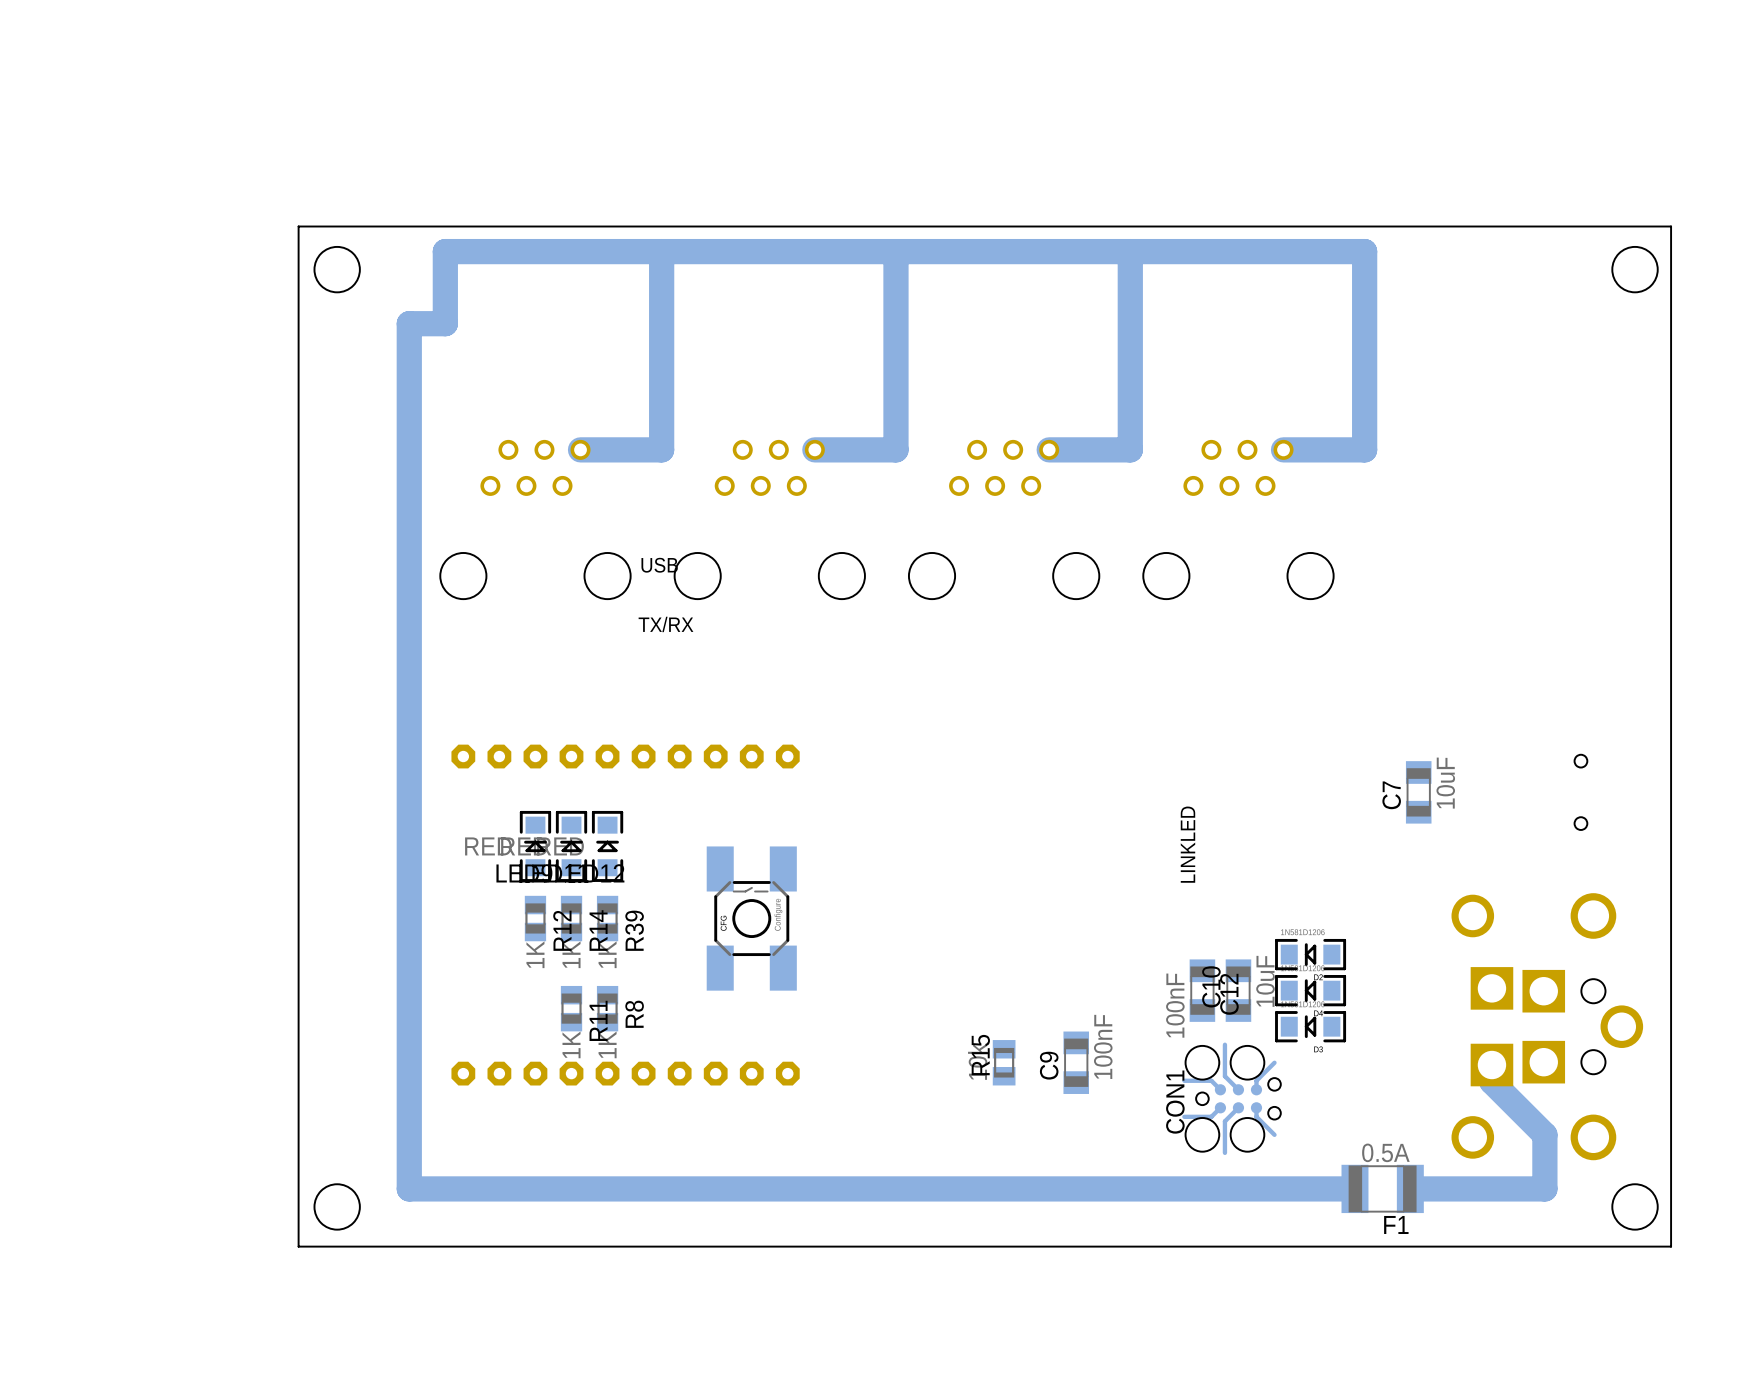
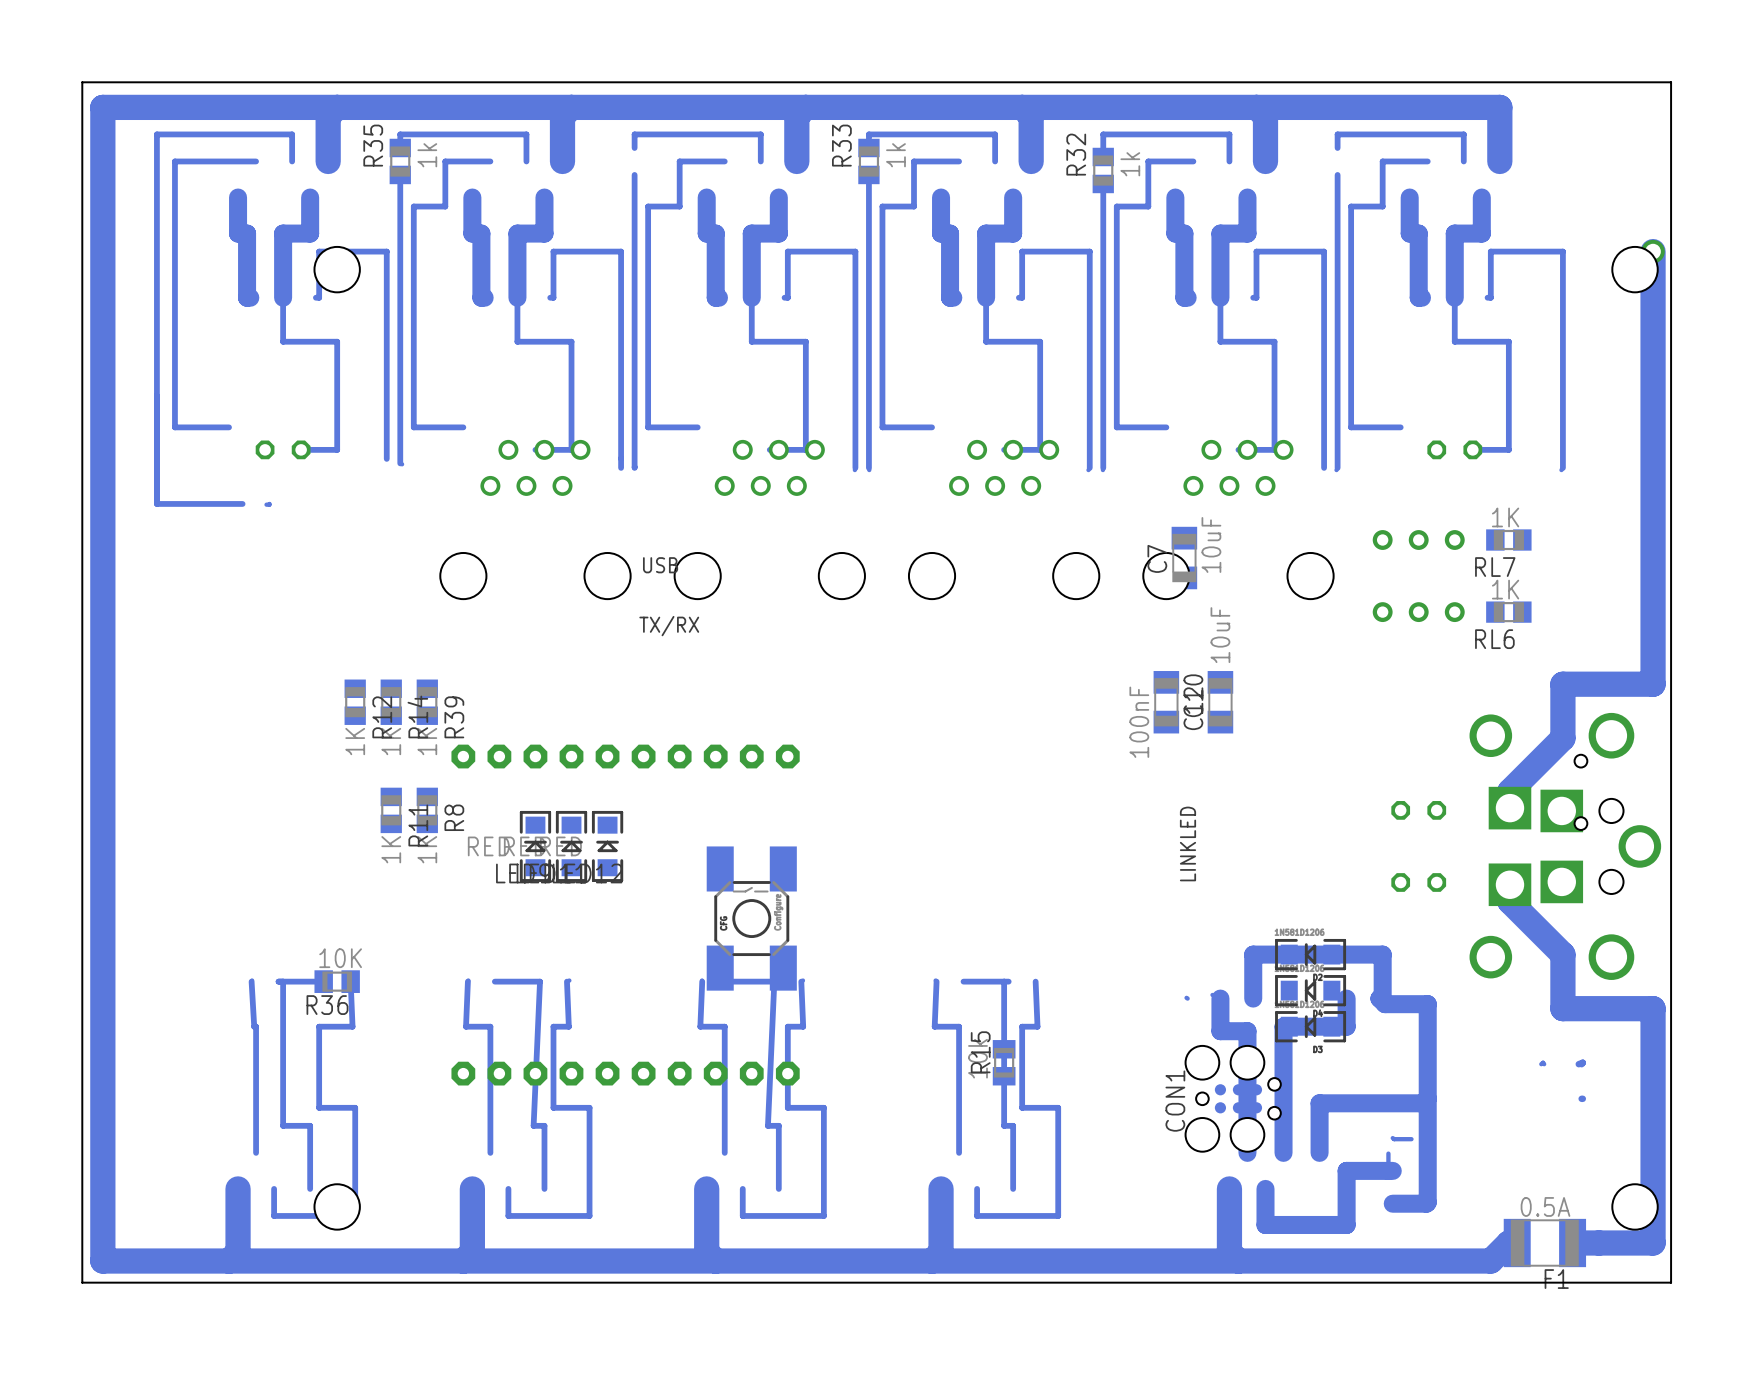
track: none -> (337, 107) (328, 116) (328, 161)
track: none -> (571, 107) (562, 116) (562, 161)
track: none -> (805, 107) (796, 116) (796, 161)
track: none -> (1022, 107) (1031, 116) (1031, 161)
track: none -> (1256, 107) (1265, 116) (1265, 161)
track: none -> (400, 147) (400, 134) (526, 134) (526, 161)
track: none -> (634, 147) (634, 134) (760, 134) (760, 161)
track: none -> (868, 147) (868, 134) (995, 134) (995, 161)
track: none -> (1337, 147) (1337, 134) (1463, 134) (1463, 161)
track: none -> (1103, 157) (1103, 134) (1229, 134) (1229, 161)
track: none -> (256, 161) (174, 161) (174, 427) (229, 427)
track: none -> (292, 161) (292, 134) (156, 134) (156, 503) (242, 503)
R35: none -> 1k (400, 161)
track: none -> (490, 161) (445, 161) (445, 206) (413, 206) (413, 427) (463, 427)
track: none -> (724, 161) (679, 161) (679, 206) (648, 206) (648, 427) (697, 427)
R33: none -> 1k (868, 161)
track: none -> (959, 161) (914, 161) (914, 206) (882, 206) (882, 427) (932, 427)
track: none -> (1193, 161) (1148, 161) (1148, 206) (1116, 206) (1116, 427) (1166, 427)
track: none -> (1427, 161) (1382, 161) (1382, 206) (1351, 206) (1351, 427) (1400, 427)
track: none -> (1499, 161) (1499, 107) (102, 107) (102, 1261) (1490, 1261) (1508, 1243) (1517, 1243)
R32: none -> 1k (1103, 170)
track: none -> (400, 174) (400, 463) (402, 464)
track: none -> (634, 174) (634, 467)
track: none -> (868, 174) (869, 470)
track: none -> (1337, 174) (1336, 470)
track: none -> (1103, 183) (1102, 470)
track: none -> (238, 197) (238, 233) (247, 233) (247, 297) (250, 297)
track: none -> (310, 197) (310, 233) (283, 233) (283, 341) (337, 341) (337, 449) (301, 449)
track: none -> (472, 197) (472, 233) (481, 233) (481, 297) (484, 297)
track: none -> (544, 197) (544, 233) (517, 233) (517, 341) (571, 341) (571, 449) (535, 449)
track: none -> (706, 197) (706, 233) (715, 233) (715, 297) (718, 297)
track: none -> (778, 197) (778, 233) (751, 233) (751, 341) (805, 341) (805, 449) (769, 449)
track: none -> (941, 197) (941, 233) (950, 233) (950, 297) (953, 297)
track: none -> (1013, 197) (1013, 233) (986, 233) (986, 341) (1040, 341) (1040, 449) (1004, 449)
track: none -> (1175, 197) (1175, 233) (1184, 233) (1184, 297) (1187, 297)
track: none -> (1247, 197) (1247, 233) (1220, 233) (1220, 341) (1274, 341) (1274, 449) (1238, 449)
track: none -> (1409, 197) (1409, 233) (1418, 233) (1418, 297) (1421, 297)
track: none -> (1481, 197) (1481, 233) (1454, 233) (1454, 341) (1508, 341) (1508, 449) (1472, 449)
board edge: (1671, 226) (298, 226) (298, 1246) (1671, 1246) -> (1671, 226) (1671, 82) (82, 82) (82, 1282) (1671, 1282) (1671, 1246)
track: (553, 251) (445, 251) (445, 323) (409, 323) (409, 1188) (1354, 1188) -> (553, 251) (553, 297) (550, 297)
track: none -> (621, 251) (621, 467)
track width: thick (621, 251) (553, 251) -> thin (621, 251) (553, 251)
track: (661, 251) (661, 449) (580, 449) -> none
track: (787, 251) (621, 251) -> (787, 251) (787, 297) (784, 297)
track: none -> (855, 251) (854, 470)
track width: thick (855, 251) (787, 251) -> thin (855, 251) (787, 251)
track: (895, 251) (895, 449) (814, 449) -> none
track: (1022, 251) (855, 251) -> (1022, 251) (1022, 297) (1018, 297)
track: none -> (1089, 251) (1088, 470)
track width: thick (1089, 251) (1022, 251) -> thin (1089, 251) (1022, 251)
track: (1130, 251) (1130, 449) (1049, 449) -> none
track: (1256, 251) (1089, 251) -> (1256, 251) (1256, 297) (1253, 297)
track: (1324, 251) (1364, 251) (1364, 449) (1283, 449) -> (1324, 251) (1324, 467)
track width: thick (1324, 251) (1256, 251) -> thin (1324, 251) (1256, 251)
track: none -> (1653, 251) (1653, 684) (1562, 684) (1562, 738) (1509, 791) (1509, 808)
via: none -> (1653, 251)
track: none -> (315, 297) (319, 297) (319, 251) (386, 251) (386, 458)
track: none -> (1487, 297) (1490, 297) (1490, 251) (1562, 251) (1561, 470)
part: none -> (283, 449)
part: none -> (1454, 449)
track: none -> (269, 503) (266, 504)
part: none -> (1418, 540)
RL7: none -> 1K (1508, 540)
part: none -> (1418, 612)
RL6: none -> 1K (1508, 612)
C7 position: (1418, 792) -> (1184, 558)
part: none -> (1418, 810)
part: none -> (1418, 882)
track: none -> (1509, 884) (1509, 901) (1562, 954) (1562, 1008) (1653, 1008) (1653, 1243) (1572, 1243)
R12 position: (535, 918) -> (355, 702)
R14 position: (571, 918) -> (391, 702)
R39 position: (607, 918) -> (427, 702)
track: none -> (252, 980) (254, 1026) (256, 1026) (256, 1152)
track: none -> (321, 980) (323, 981) (278, 981)
track: none -> (353, 980) (350, 981) (352, 1026) (319, 1026) (319, 1107) (355, 1107) (355, 1215) (274, 1215) (274, 1188)
track: none -> (468, 980) (466, 1026) (490, 1026) (490, 1152)
track: none -> (569, 980) (566, 981) (568, 1026) (553, 1026) (553, 1107) (589, 1107) (589, 1215) (508, 1215) (508, 1188)
track: none -> (702, 980) (700, 1026) (724, 1026) (724, 1152)
track: none -> (802, 980) (801, 981) (803, 1026) (787, 1026) (787, 1107) (823, 1107) (823, 1215) (742, 1215) (742, 1188)
track: none -> (935, 980) (934, 1026) (959, 1026) (959, 1152)
track: none -> (283, 981) (283, 1125) (310, 1125) (310, 1188)
R36: none -> 10K (337, 981)
track: none -> (494, 981) (540, 981) (533, 1125) (544, 1125) (544, 1188)
track: none -> (729, 981) (774, 981) (767, 1125) (778, 1125) (778, 1188)
track: none -> (1004, 981) (1004, 1125) (1013, 1125) (1013, 1188)
track: none -> (1008, 981) (963, 981)
track: none -> (1035, 981) (1037, 1026) (1022, 1026) (1022, 1107) (1058, 1107) (1058, 1215) (977, 1215) (977, 1188)
C10 value position: 10uF (1265, 981) -> 10uF (1220, 635)
C12 position: (1202, 990) -> (1166, 702)
C10 position: (1238, 990) -> (1220, 702)
track: none -> (1212, 994) (1220, 998) (1220, 1031) (1247, 1031) (1247, 1152)
track: none -> (1186, 997) (1187, 998)
track: none -> (1253, 998) (1253, 954) (1382, 954) (1382, 998) (1379, 998) (1385, 1004) (1427, 1004) (1427, 1202) (1392, 1203)
track: none -> (1346, 998) (1346, 1026) (1283, 1026) (1283, 1152)
R11 position: (571, 1008) -> (391, 810)
R8 position: (607, 1008) -> (427, 810)
part position: (1547, 1026) -> (1565, 846)
track: (1224, 1044) (1224, 1076) (1238, 1089) -> none
C9: 100nF (1076, 1062) -> none
track: (1274, 1062) (1256, 1080) (1256, 1089) -> none
track: none -> (1544, 1064) (1541, 1064)
track: none -> (1581, 1064) (1582, 1062) (1578, 1064)
track: (1491, 1065) (1491, 1081) (1544, 1134) (1544, 1188) (1410, 1188) -> none
track: (1184, 1080) (1211, 1080) (1220, 1089) -> none
track: none -> (1427, 1098) (1423, 1103) (1319, 1103) (1319, 1152)
track: none -> (1582, 1098) (1581, 1098)
track: (1220, 1107) (1211, 1116) (1184, 1116) -> none
track: (1238, 1107) (1224, 1121) (1224, 1152) -> none
track: (1256, 1107) (1256, 1116) (1274, 1134) -> none
track: none -> (1392, 1138) (1411, 1139)
track: none -> (1388, 1153) (1388, 1170)
track: none -> (1392, 1170) (1346, 1170) (1346, 1224) (1265, 1224) (1265, 1188)
track: none -> (238, 1188) (238, 1252) (229, 1261)
track: none -> (472, 1188) (472, 1252) (463, 1261)
track: none -> (706, 1188) (706, 1252) (715, 1261)
track: none -> (941, 1188) (941, 1252) (932, 1261)
track: none -> (1229, 1188) (1229, 1252) (1238, 1261)
F1 position: (1382, 1188) -> (1544, 1243)

